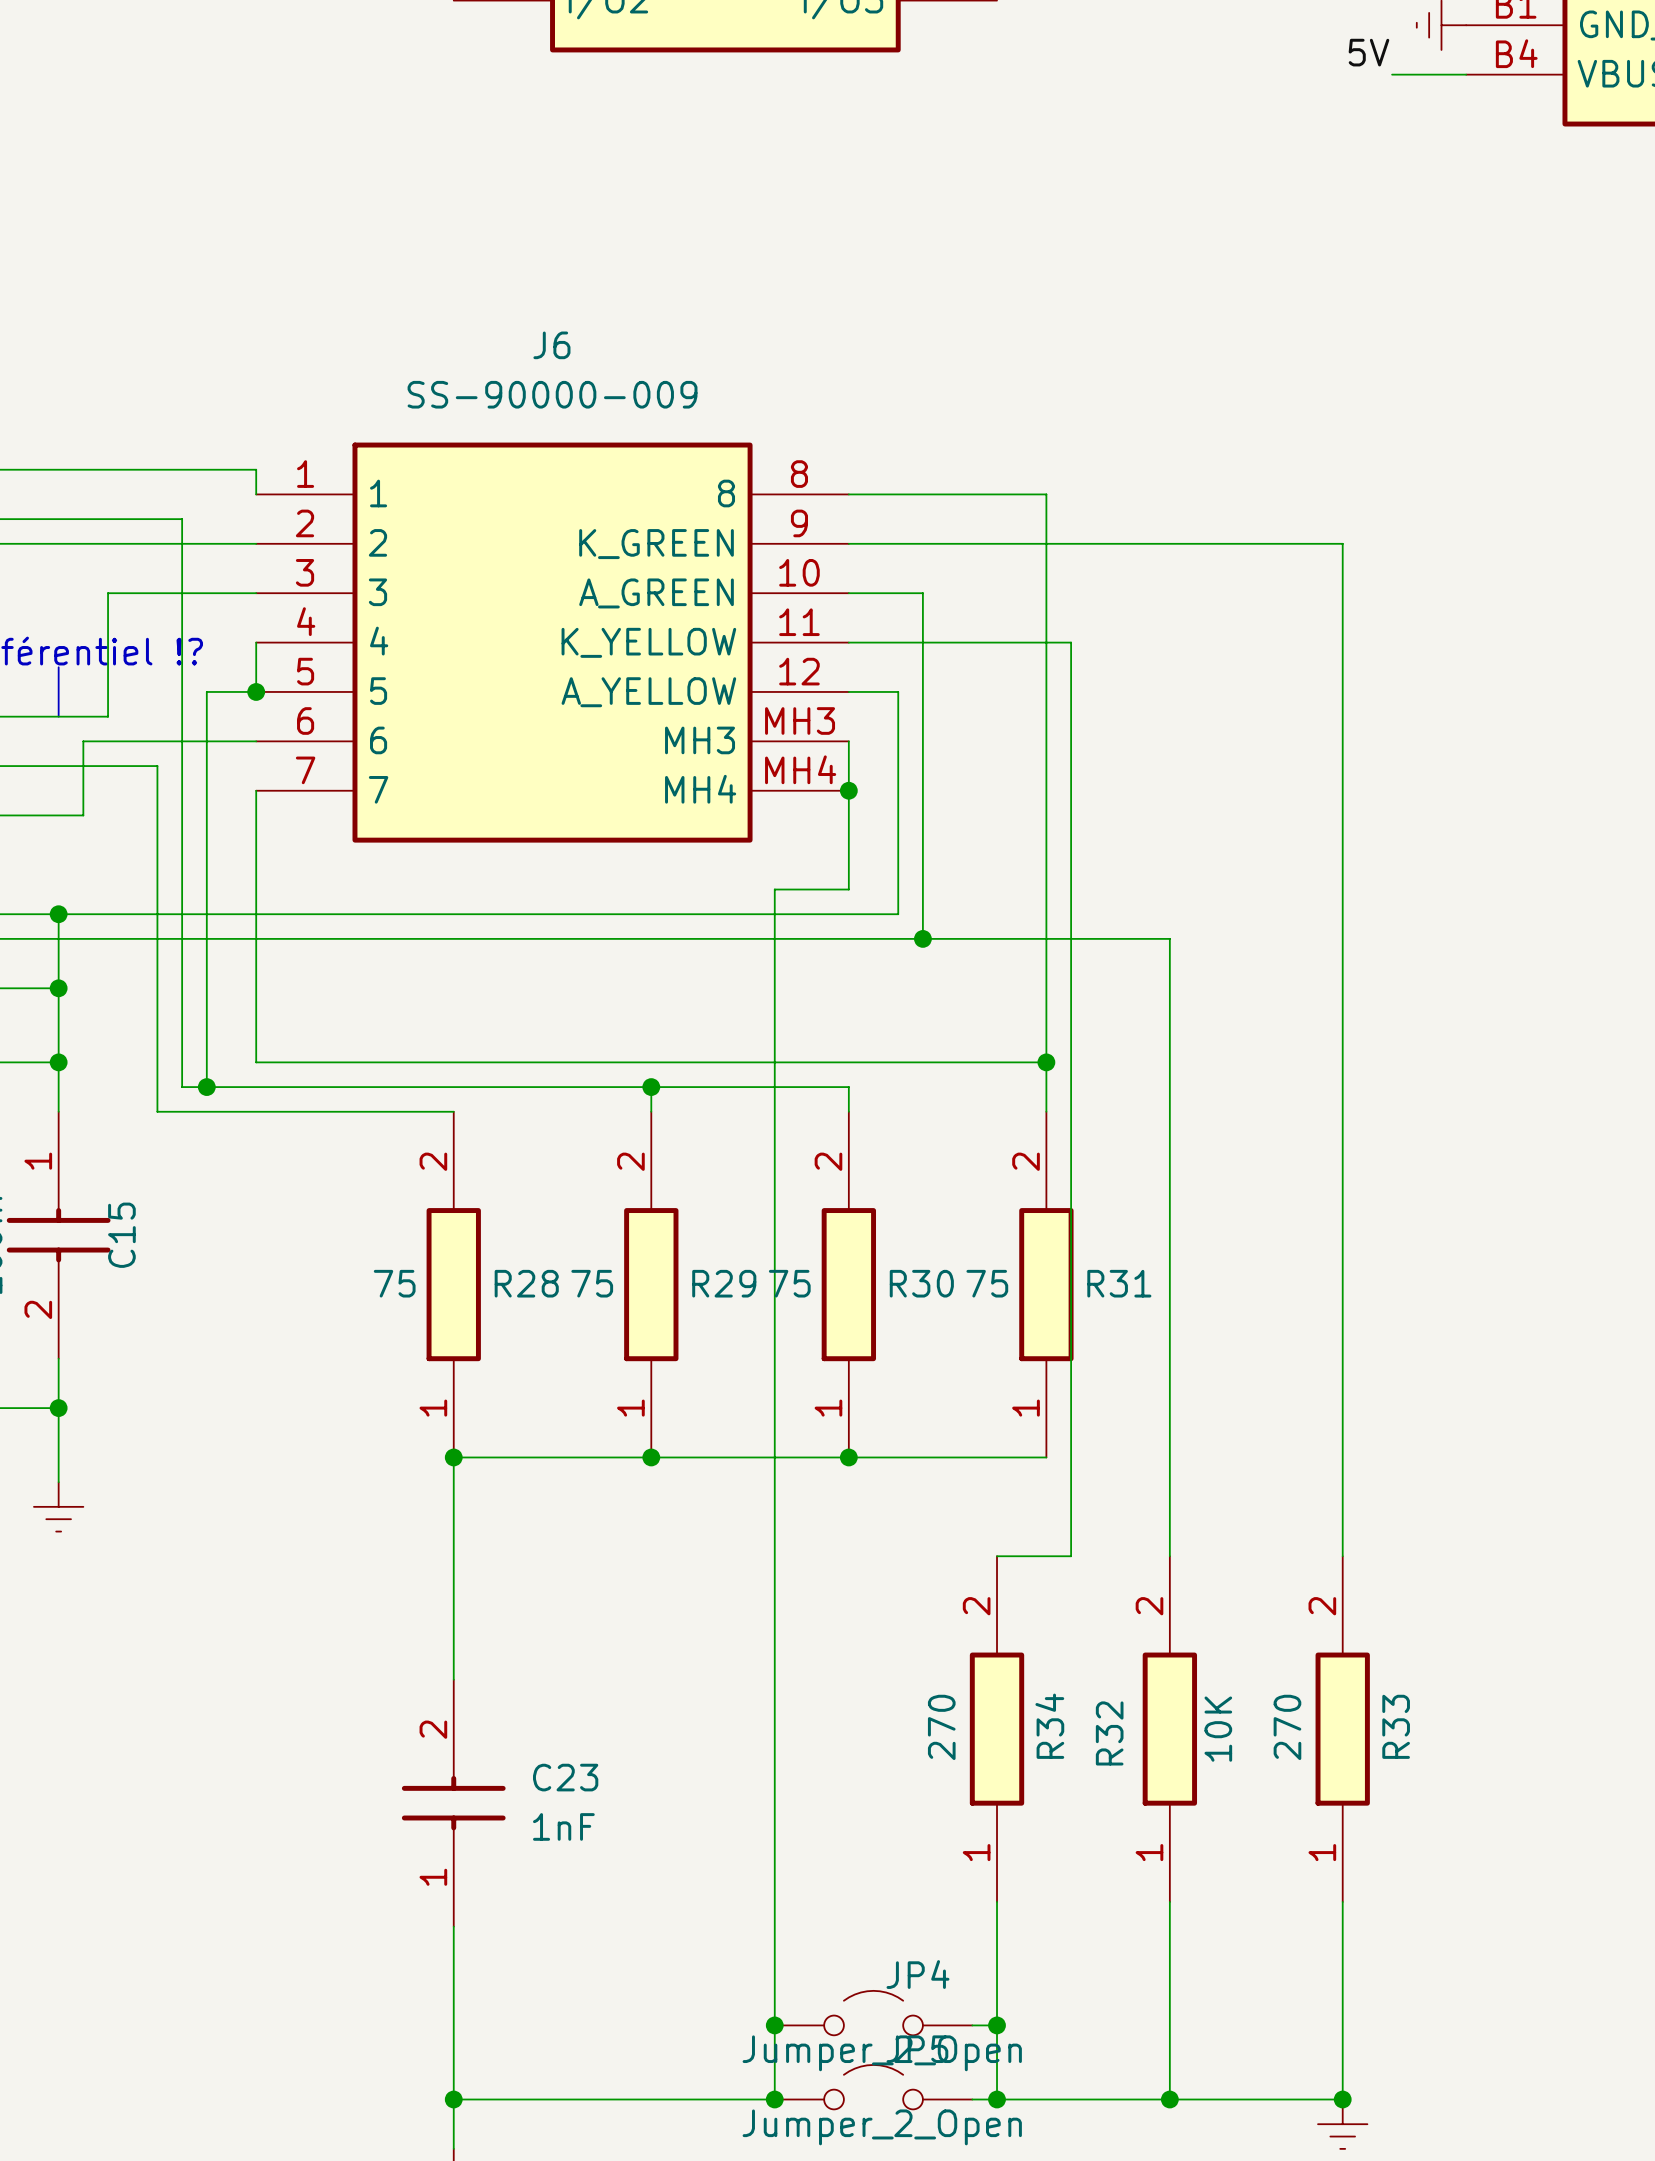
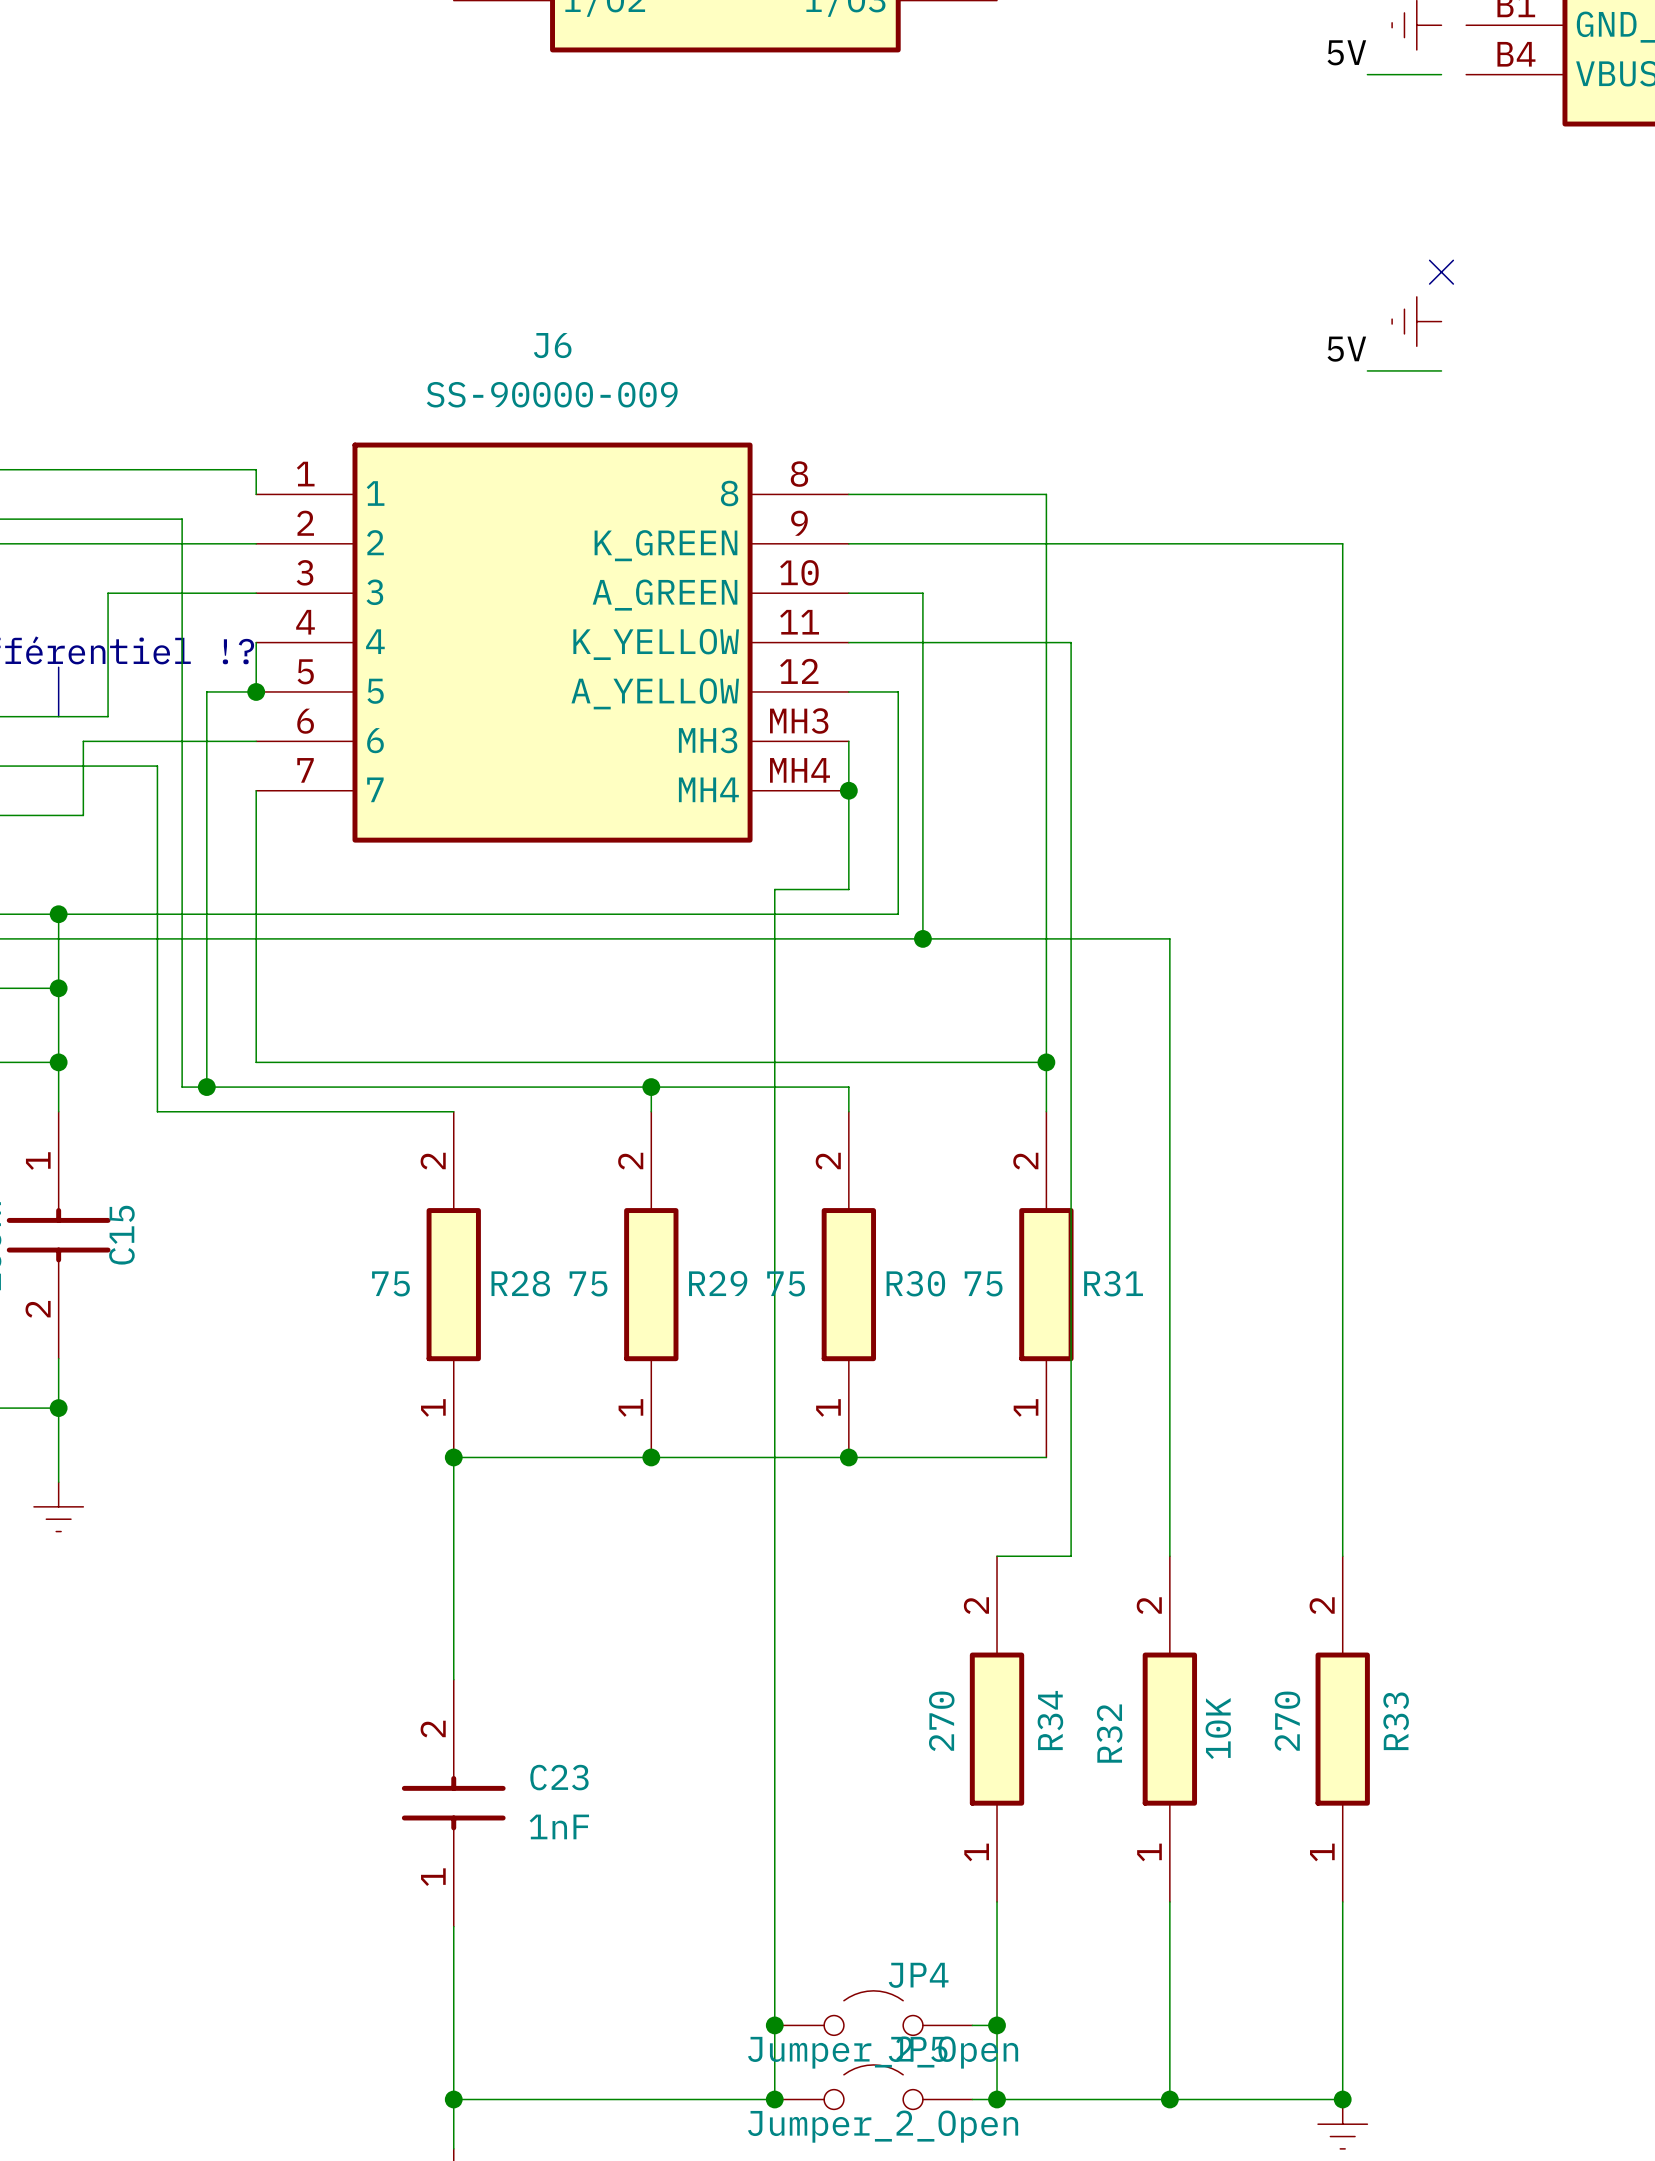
power symbol position: (1441, 25) -> (1416, 25)
label position: 5V (1368, 52) -> 5V (1346, 52)
wire: (1441, 74) (1466, 74) -> (1367, 74) (1392, 74)
no-connect mark: none -> (1441, 272)
power symbol: none -> (1416, 321)
label: none -> 5V (1346, 349)
wire: none -> (1367, 370) (1441, 370)

